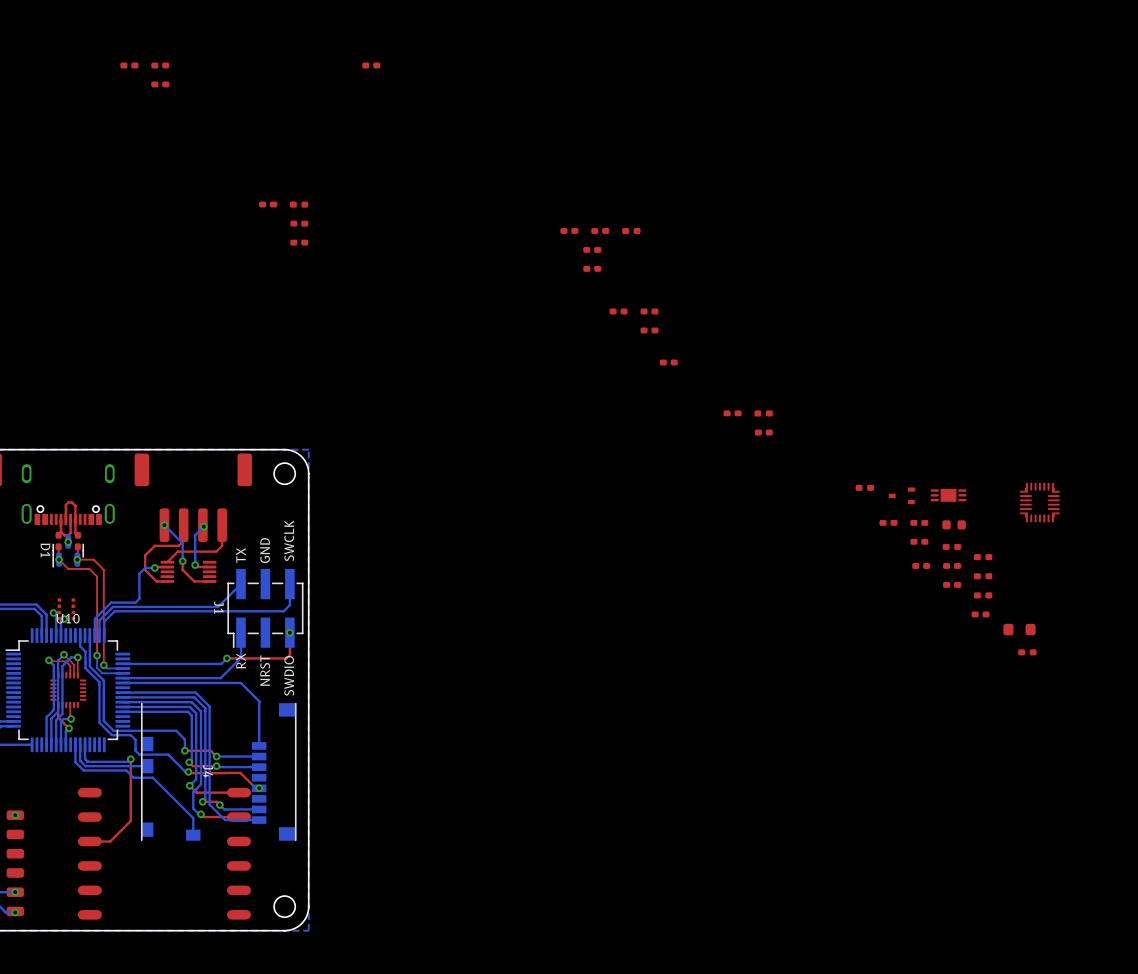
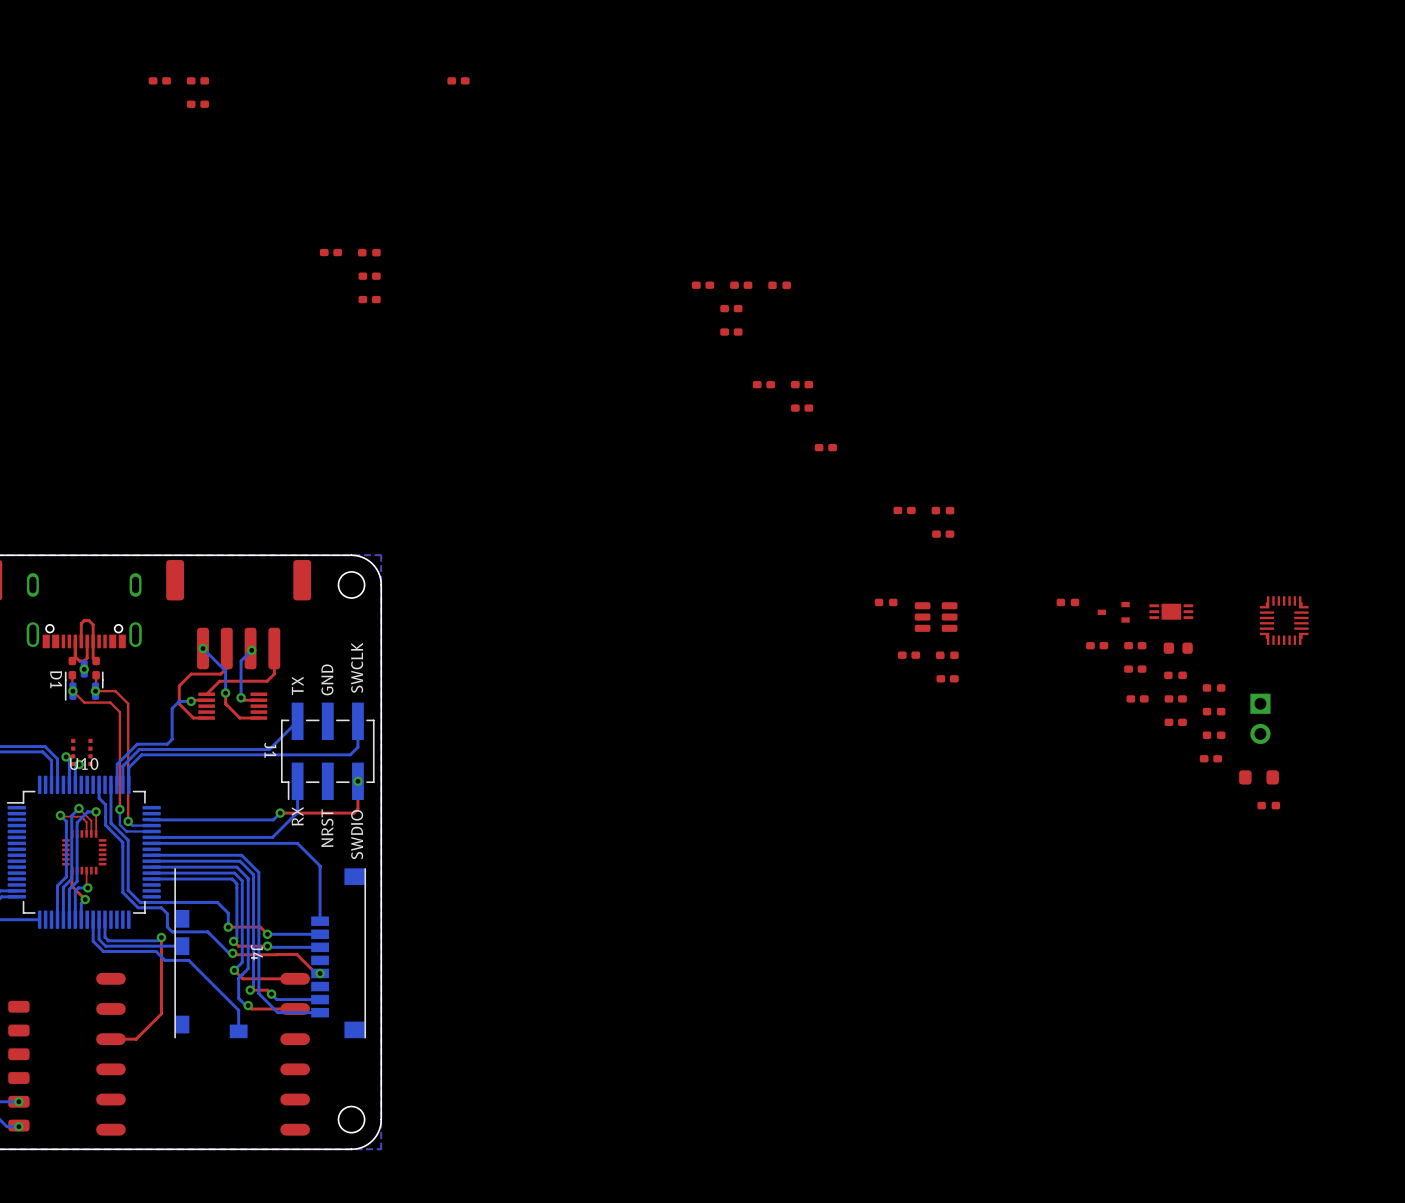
part: none -> (886, 602)
part: none -> (936, 617)
part: none -> (908, 655)
part: none -> (947, 655)
part: none -> (947, 678)
part: none -> (1260, 718)
via: (15, 815) -> none

